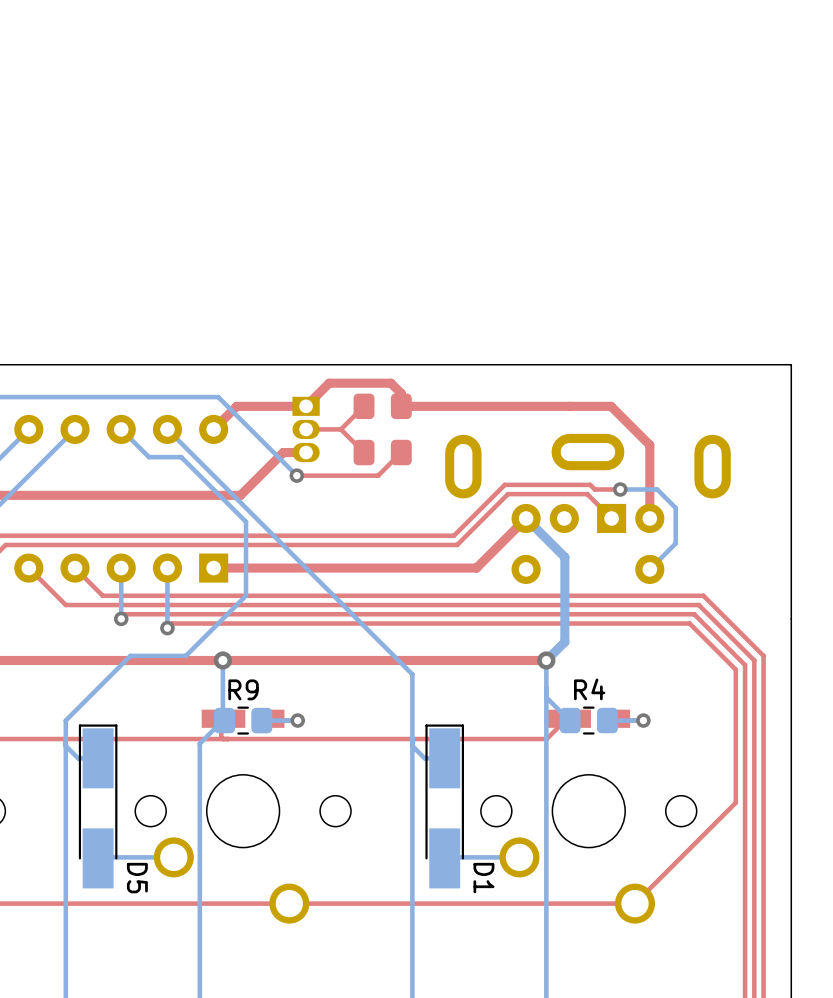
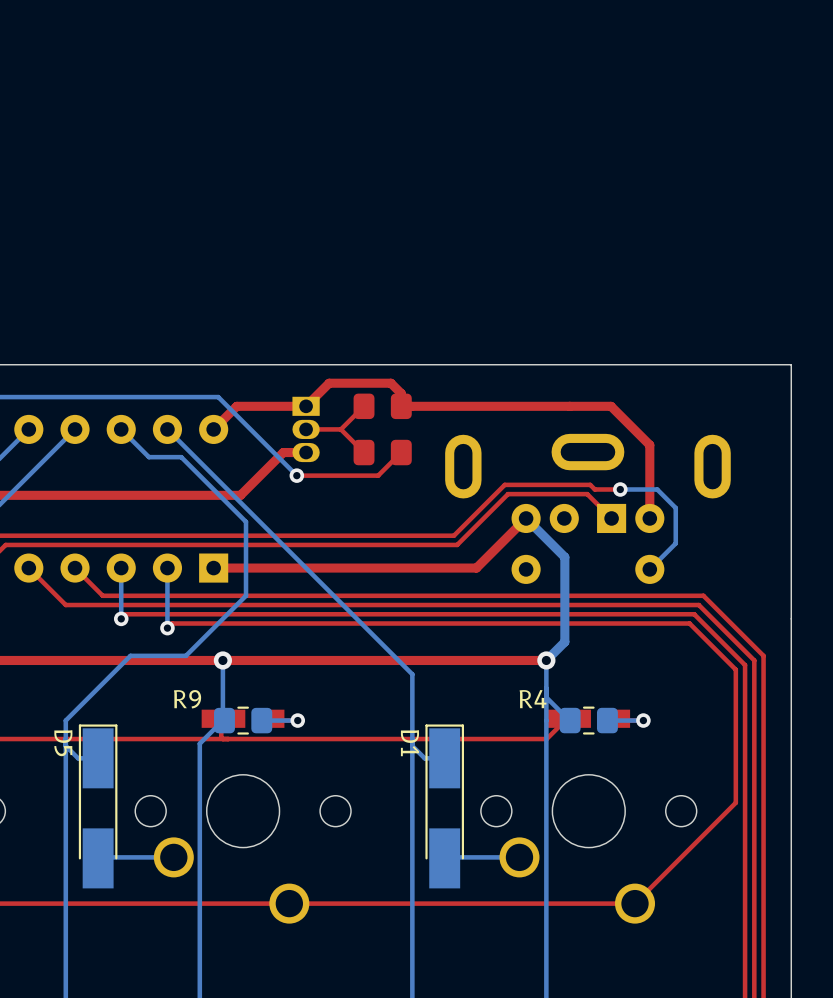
R9 name position: R9 (243, 689) -> R9 (187, 699)
R4 name position: R4 (589, 689) -> R4 (533, 699)
D5 name position: D5 (137, 878) -> D5 (63, 743)
D1 name position: D1 (483, 878) -> D1 (410, 743)

